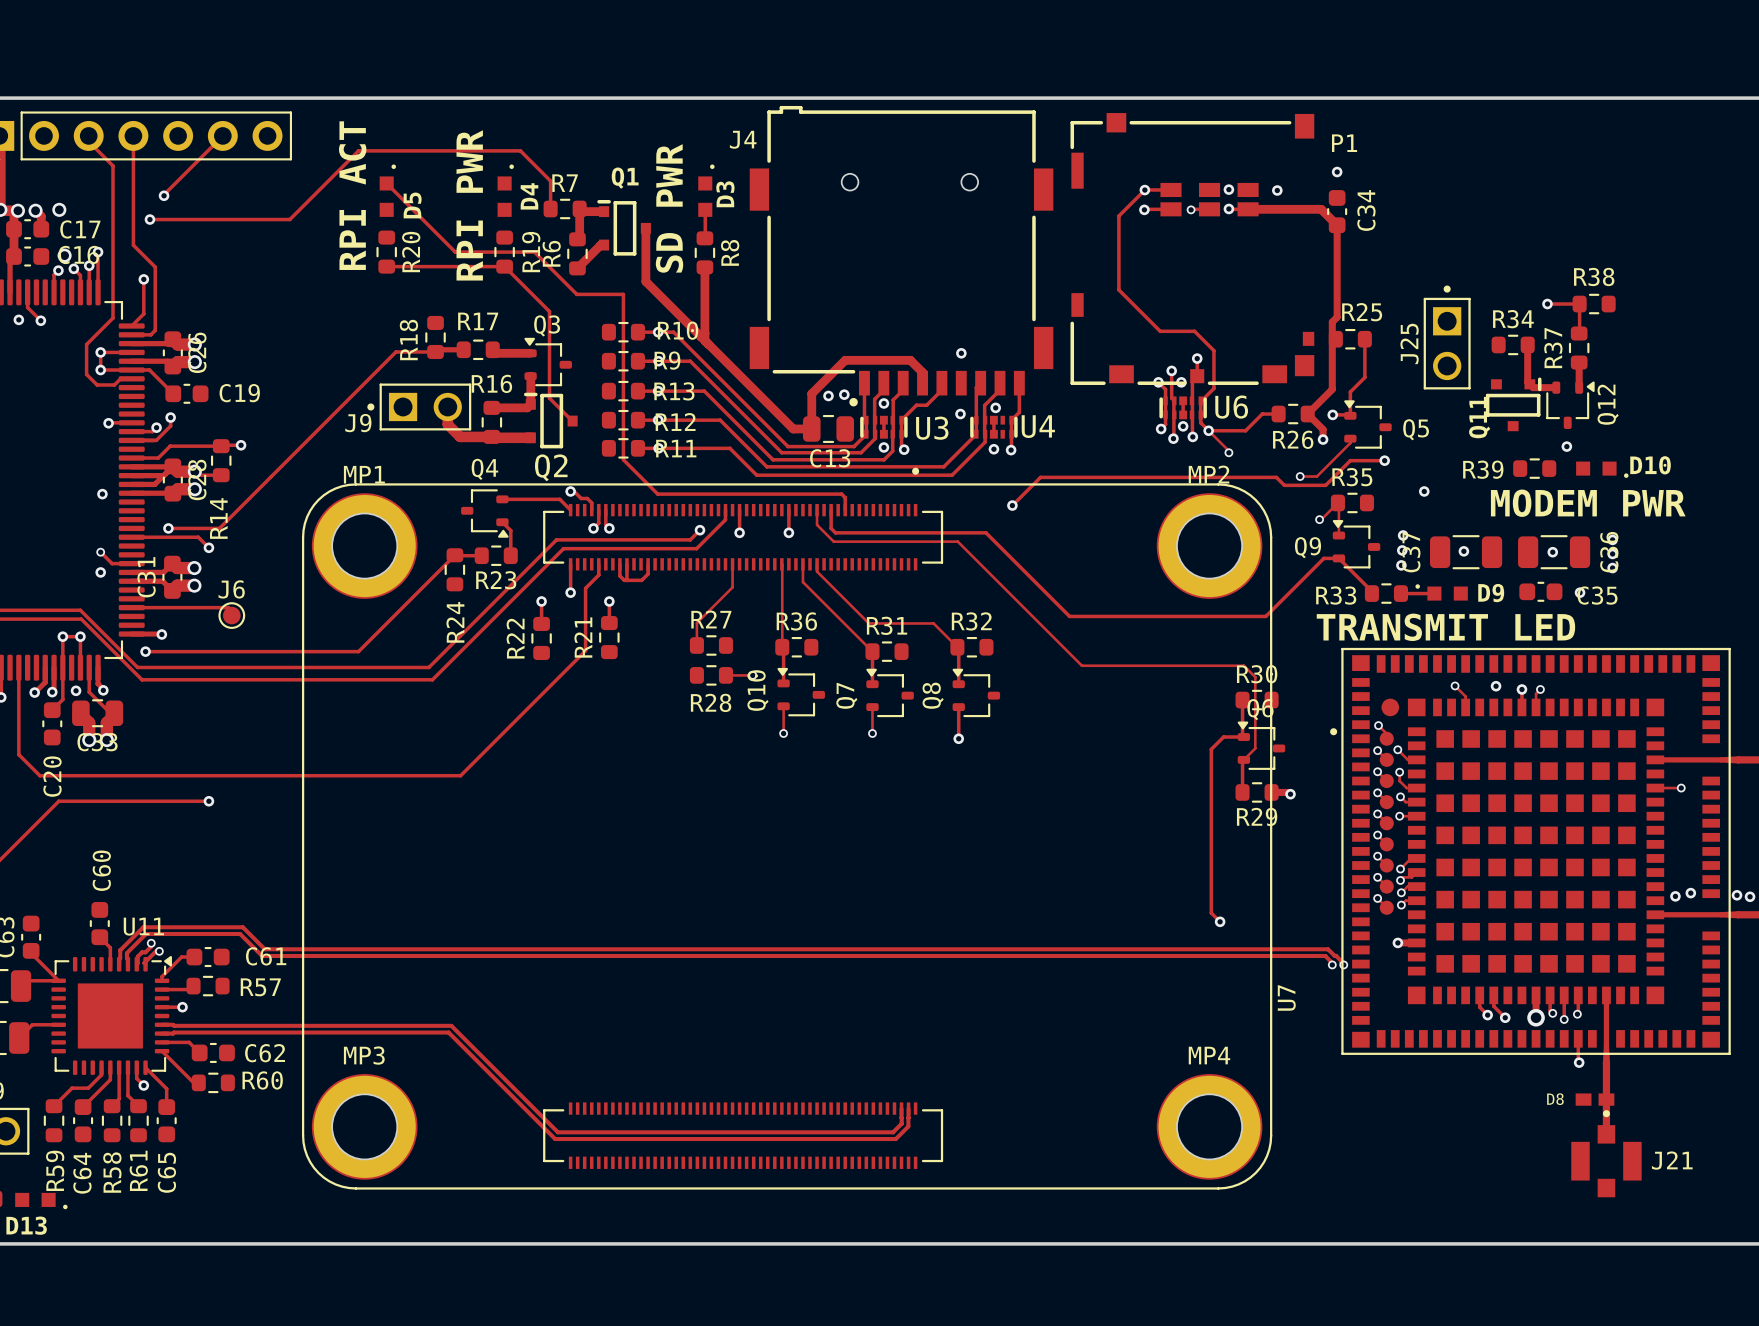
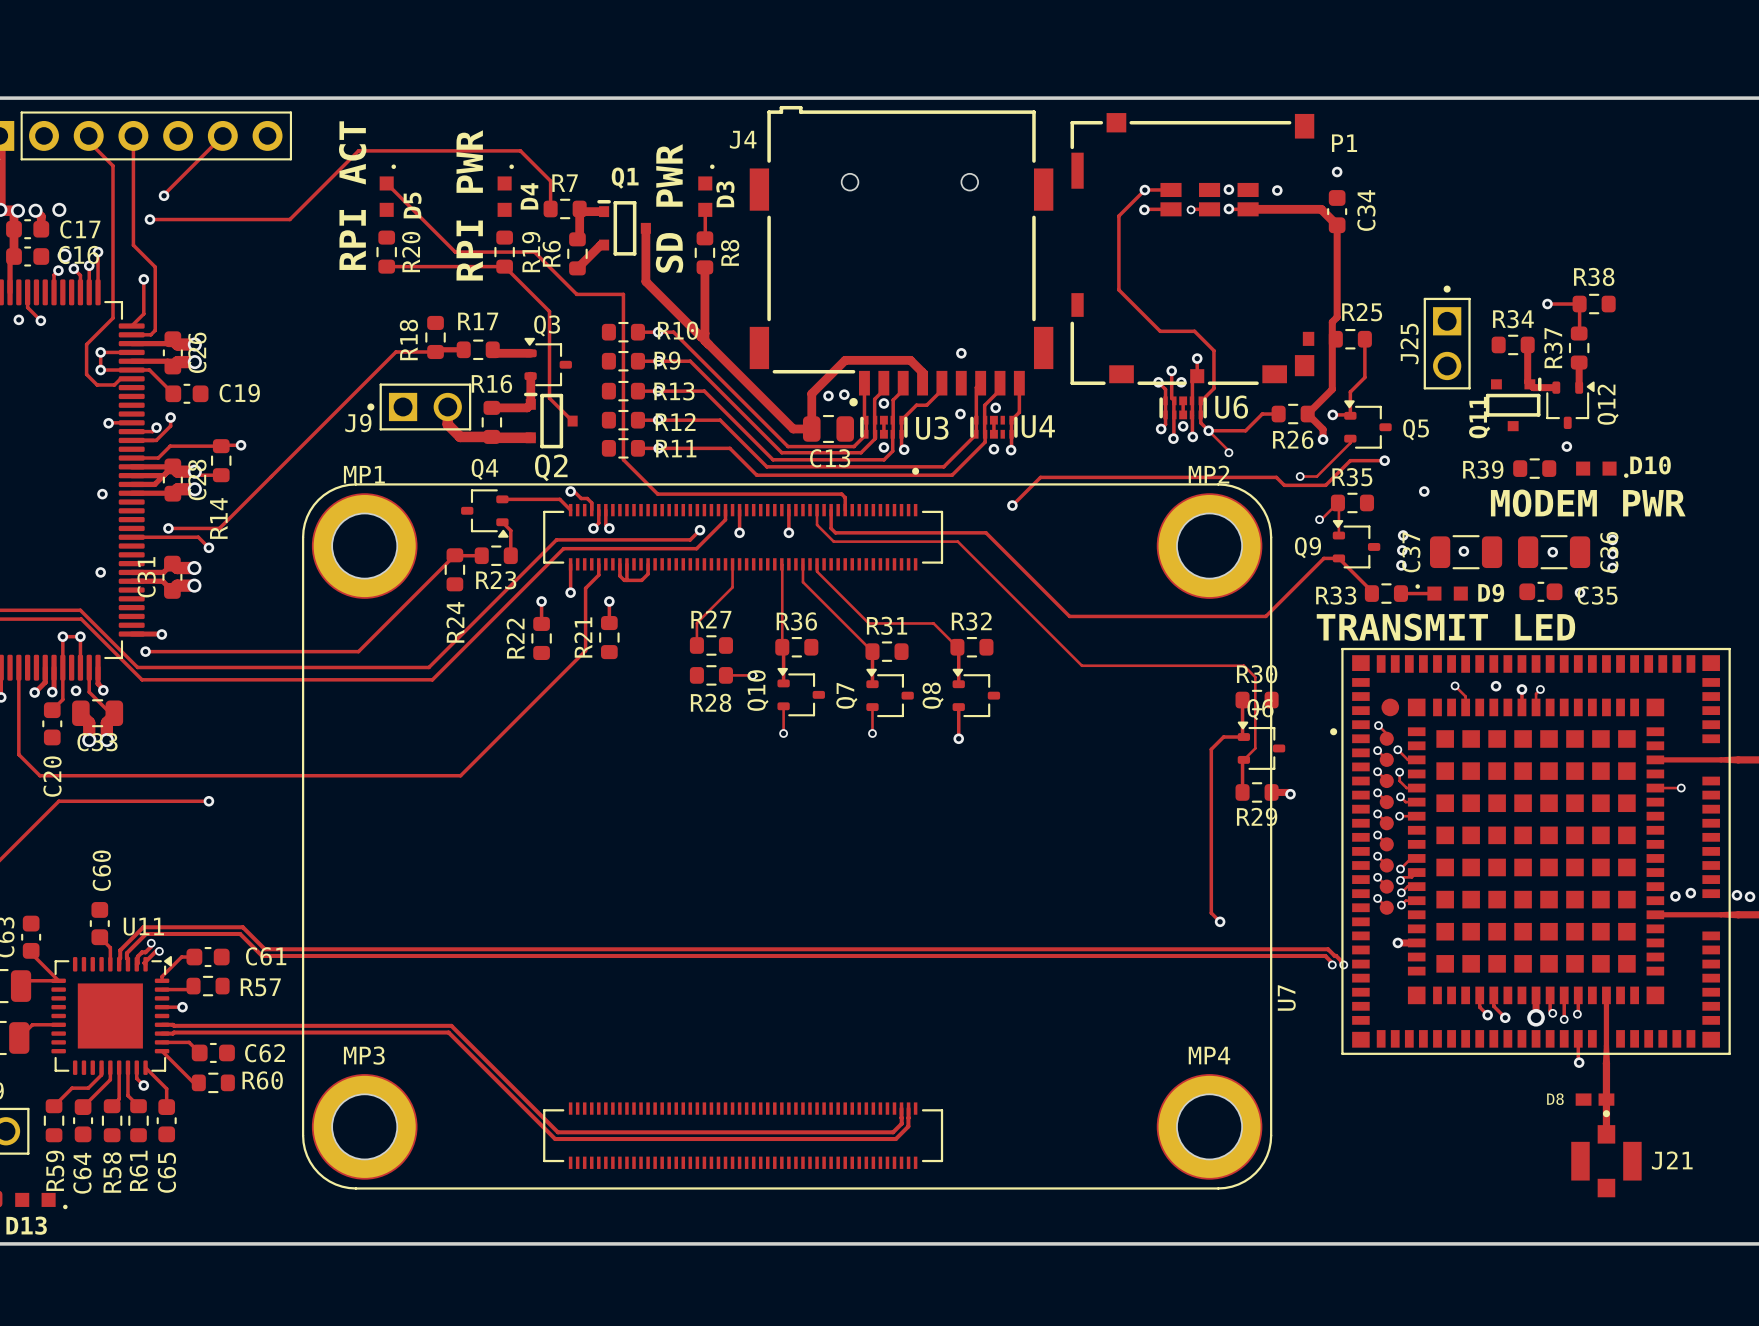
track: (100, 552) (112, 563) (131, 563) -> none
via: (100, 552) -> none
track: (131, 607) (228, 607) (231, 611) (231, 615) -> none
J6: (231, 615) -> none

